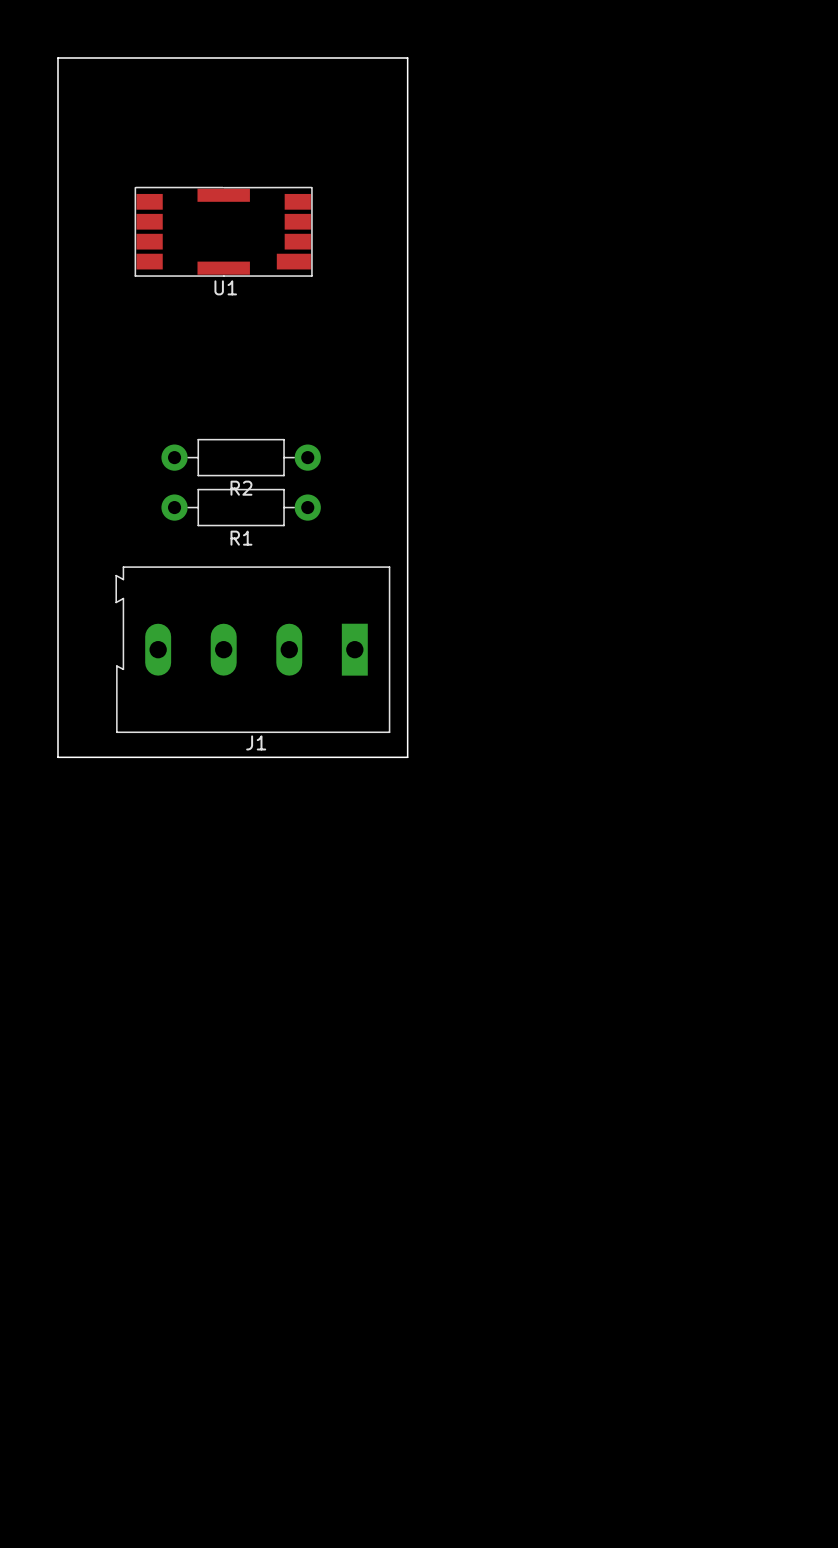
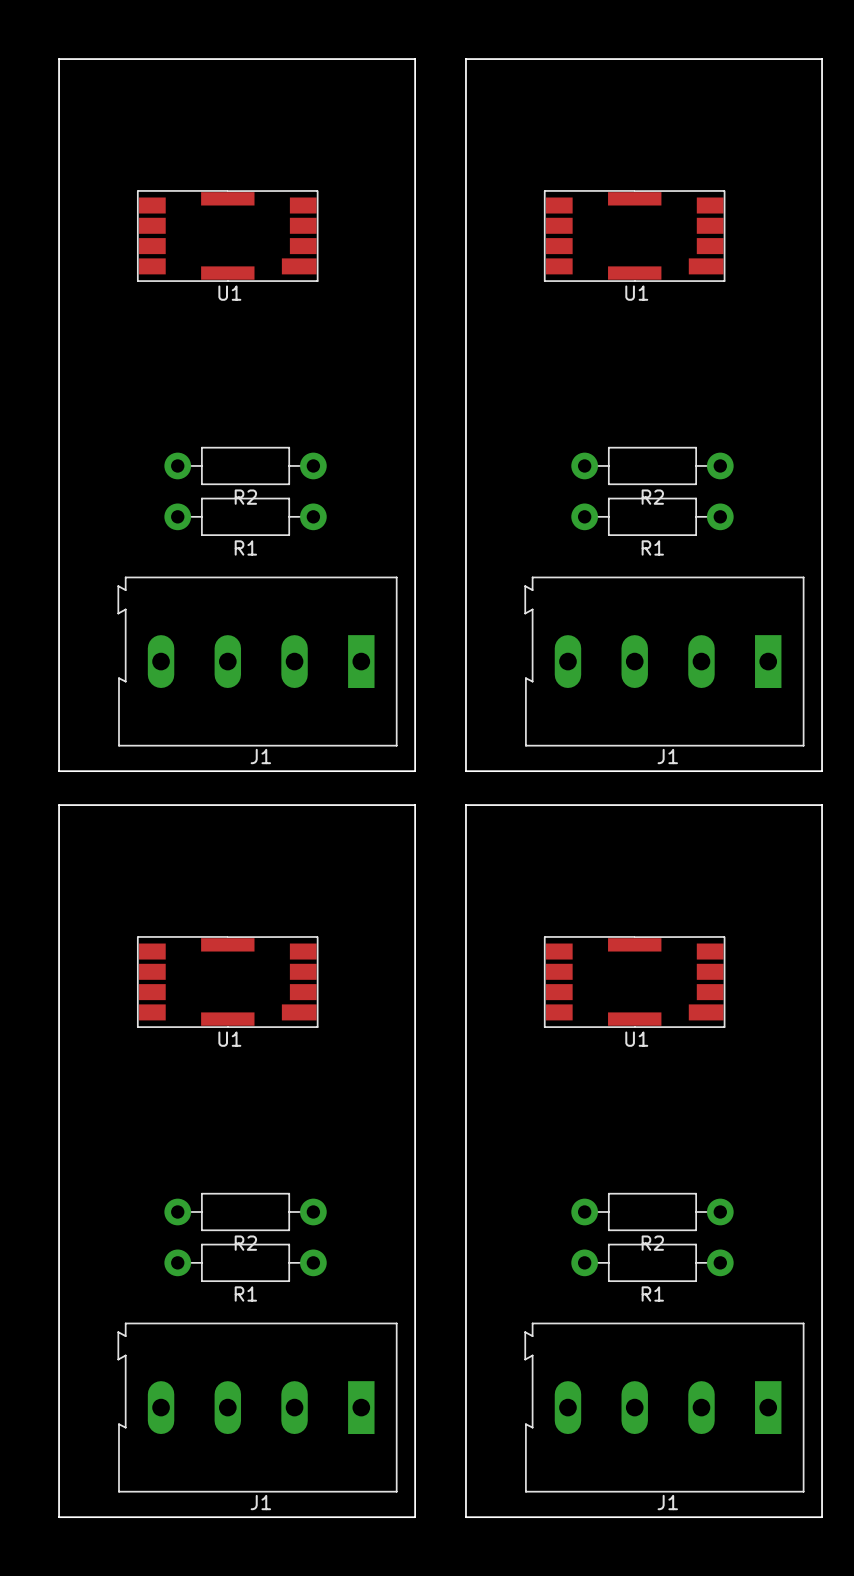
board edge: none -> (465, 59) (465, 771) (822, 771) (822, 59) (465, 59)
U1: none -> (634, 236)
R2: none -> (652, 465)
R1: none -> (652, 516)
J1: none -> (664, 661)
board edge: none -> (59, 805) (415, 805) (415, 1517) (59, 1517) (59, 805)
board edge: none -> (465, 805) (822, 805) (822, 1517) (465, 1517) (465, 805)
U1: none -> (227, 982)
U1: none -> (634, 982)
R2: none -> (245, 1211)
R2: none -> (652, 1211)
R1: none -> (245, 1262)
R1: none -> (652, 1262)
J1: none -> (257, 1407)
J1: none -> (664, 1407)

